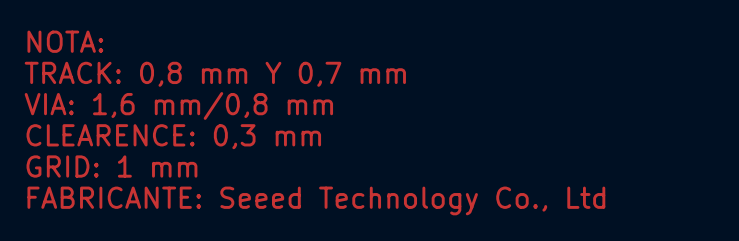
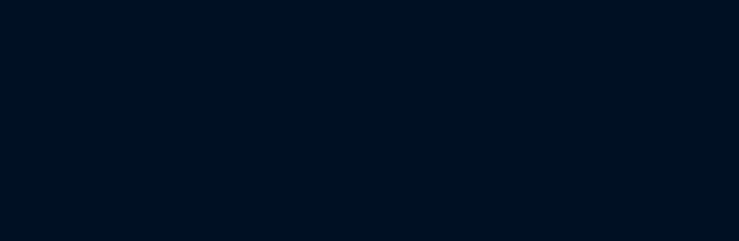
text: NOTA: (65, 41) -> none
text: TRACK: 0,8 mm Y 0,7 mm (215, 74) -> none
text: VIA: 1,6 mm/0,8 mm (178, 105) -> none
text: CLEARENCE: 0,3 mm (173, 136) -> none
text: GRID: 1 mm (111, 166) -> none
text: FABRICANTE: Seeed Technology Co., Ltd (316, 200) -> none

